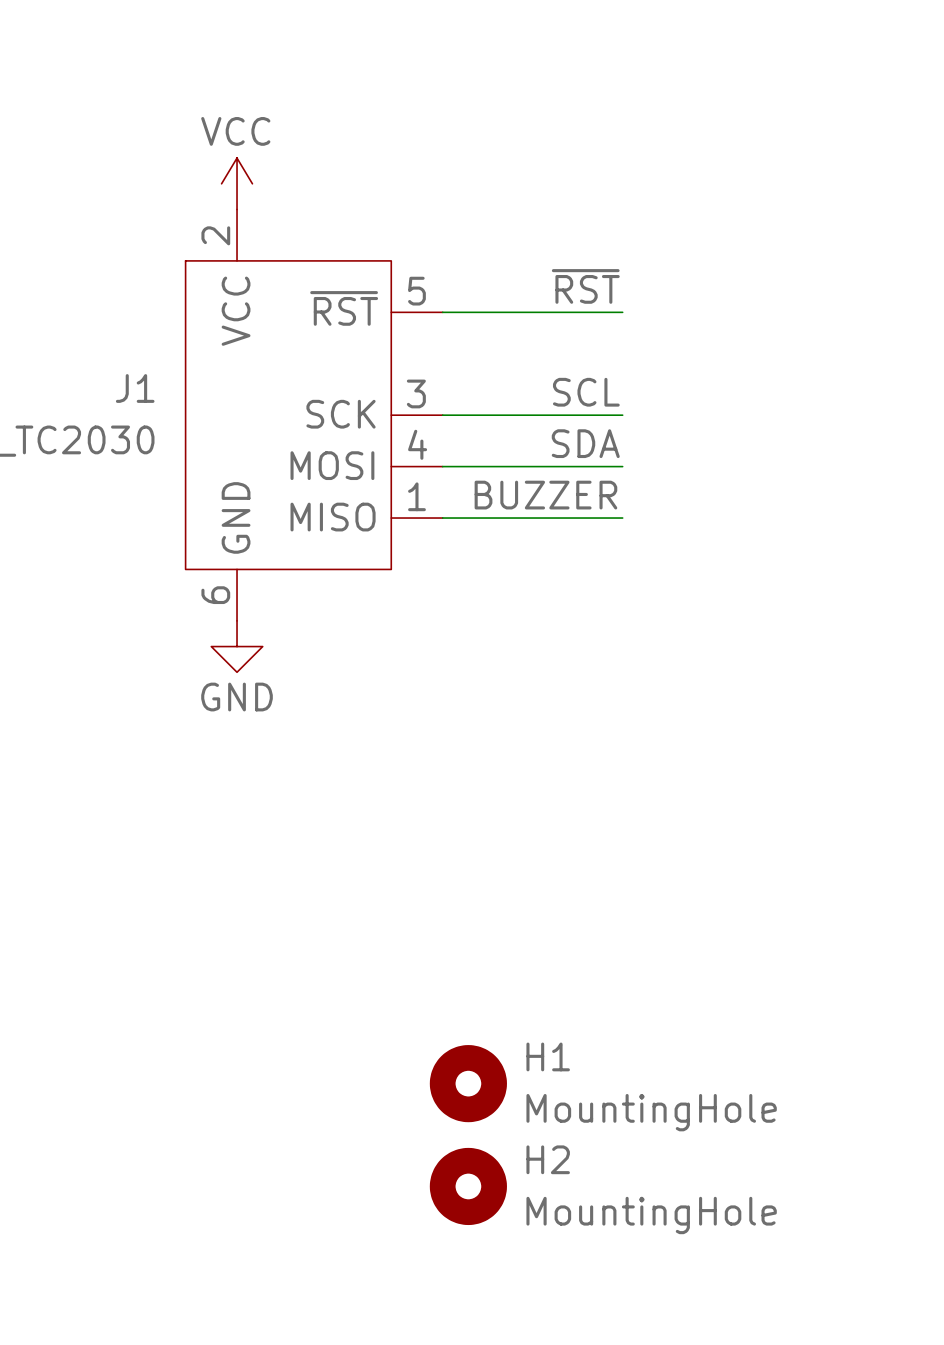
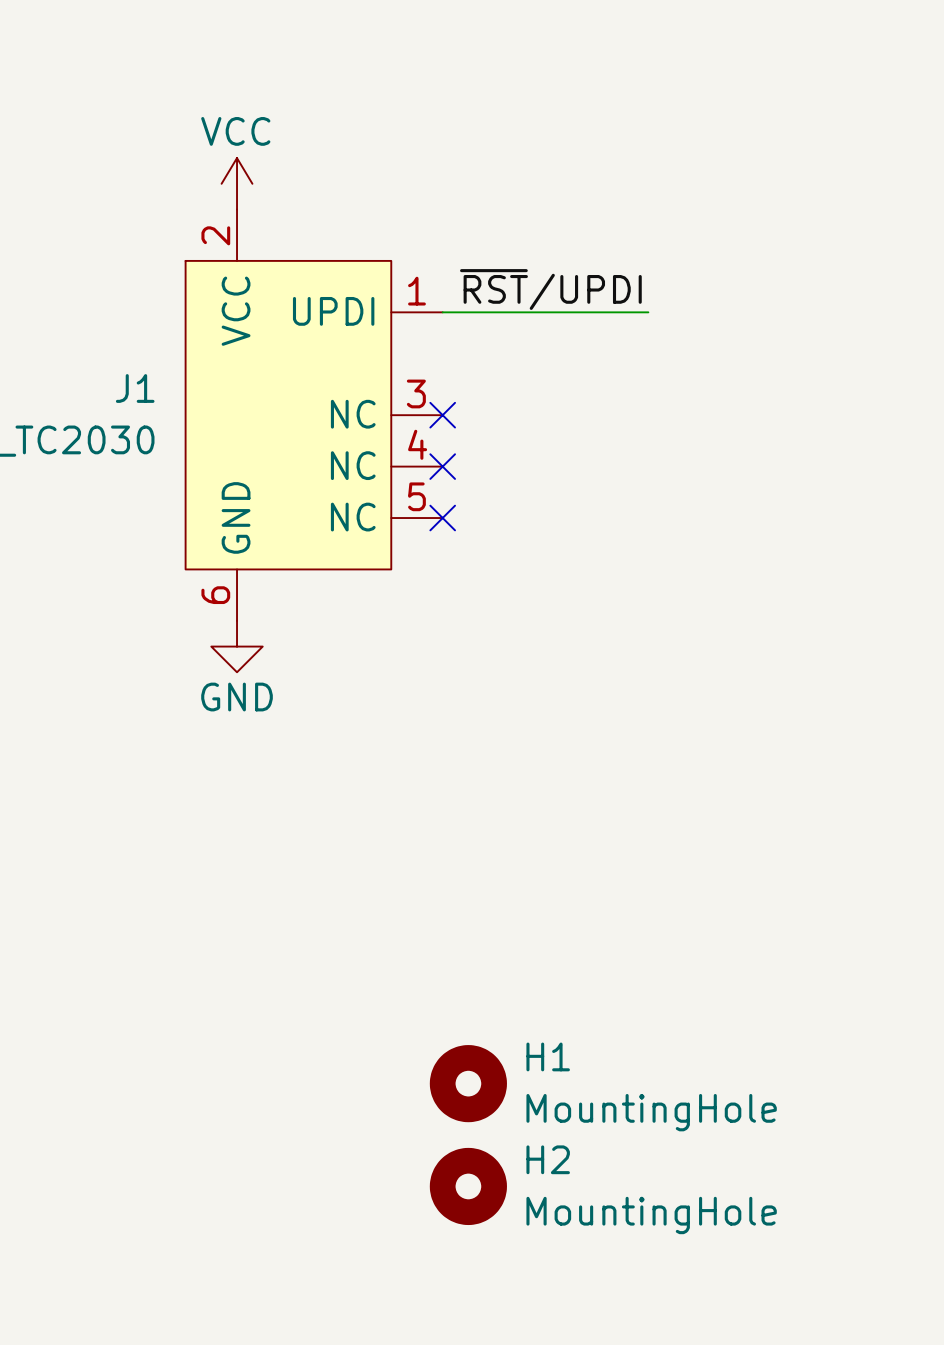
label: ~{RST} (585, 286) -> ~{RST}/UPDI (550, 289)
J1 pin number: 5 (416, 291) -> 1 (416, 291)
J1 pin name: ~{RST} (344, 308) -> UPDI (333, 311)
wire: none -> (622, 312) (648, 312)
label: SCL (586, 392) -> none
J1 pin name: SCK (341, 414) -> NC (353, 414)
wire: (442, 415) (622, 415) -> none
no-connect mark: none -> (442, 415)
label: SDA (585, 443) -> none
J1 pin name: MOSI (332, 465) -> NC (353, 465)
wire: (442, 466) (622, 466) -> none
no-connect mark: none -> (442, 466)
label: BUZZER (545, 495) -> none
J1 pin number: 1 (416, 496) -> 5 (416, 496)
J1 pin name: MISO (333, 517) -> NC (353, 517)
wire: (442, 518) (622, 518) -> none
no-connect mark: none -> (442, 518)

